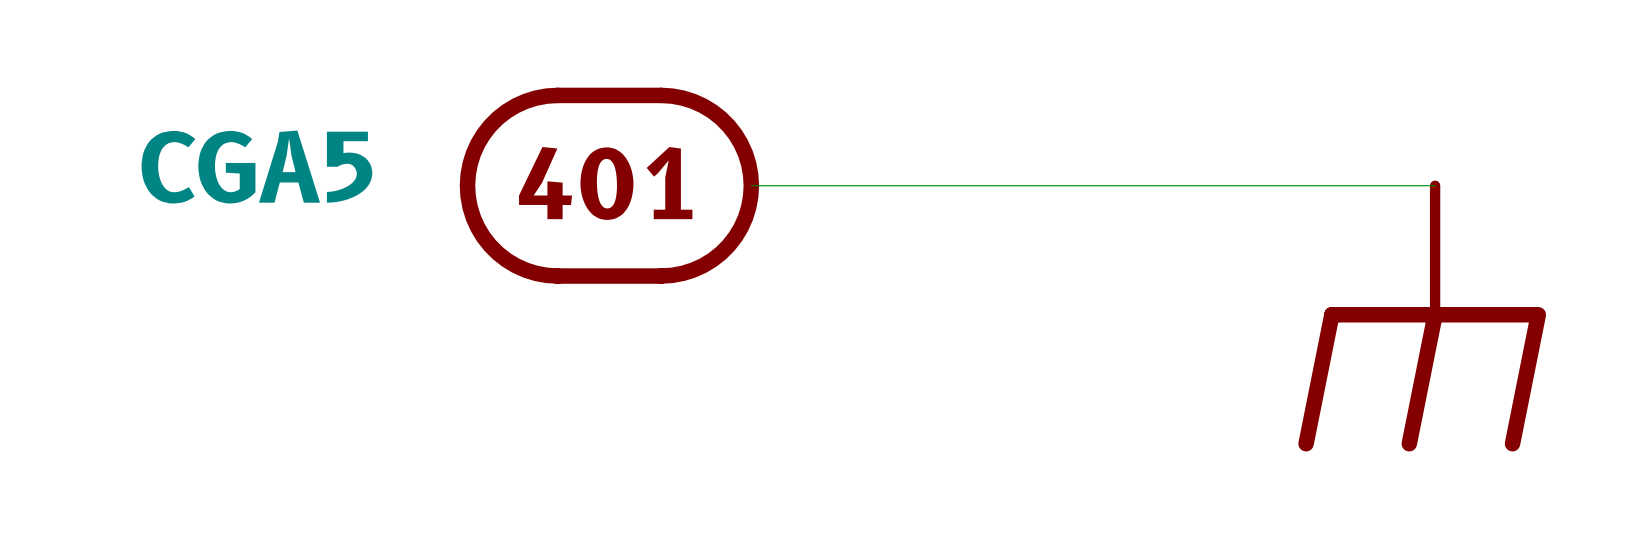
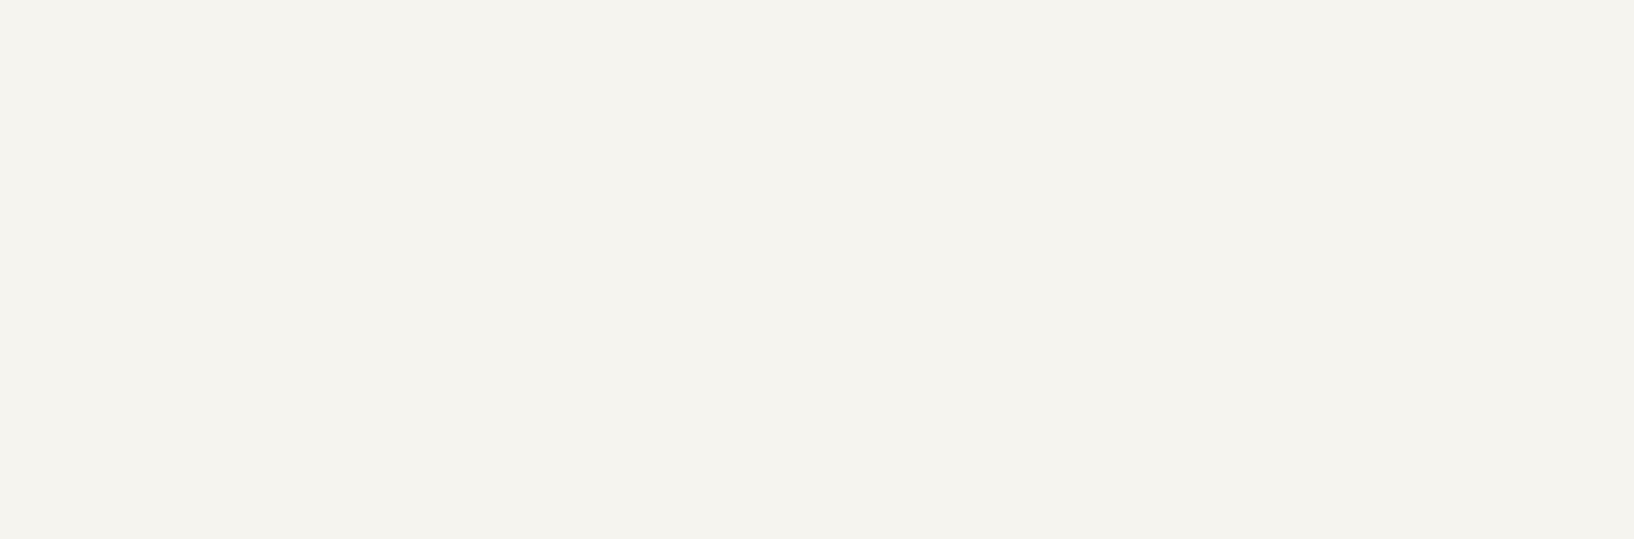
part: (609, 185) -> none
wire: (751, 185) (1435, 185) -> none
part: (1422, 316) -> none

